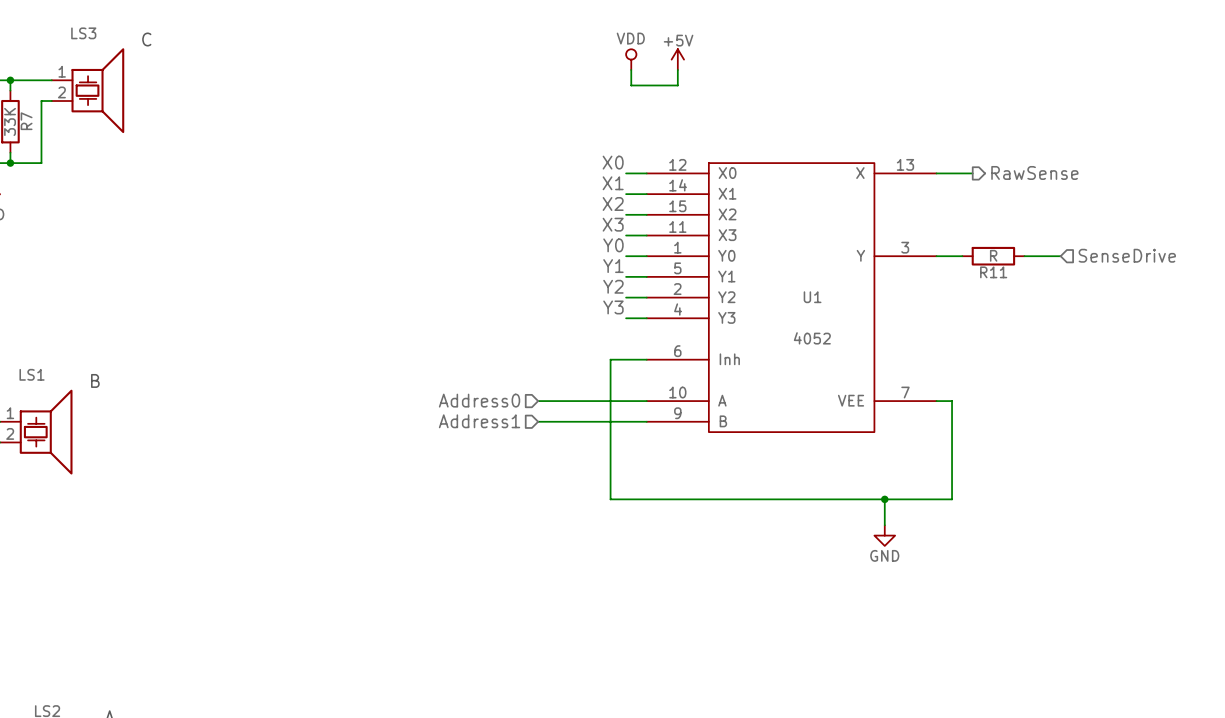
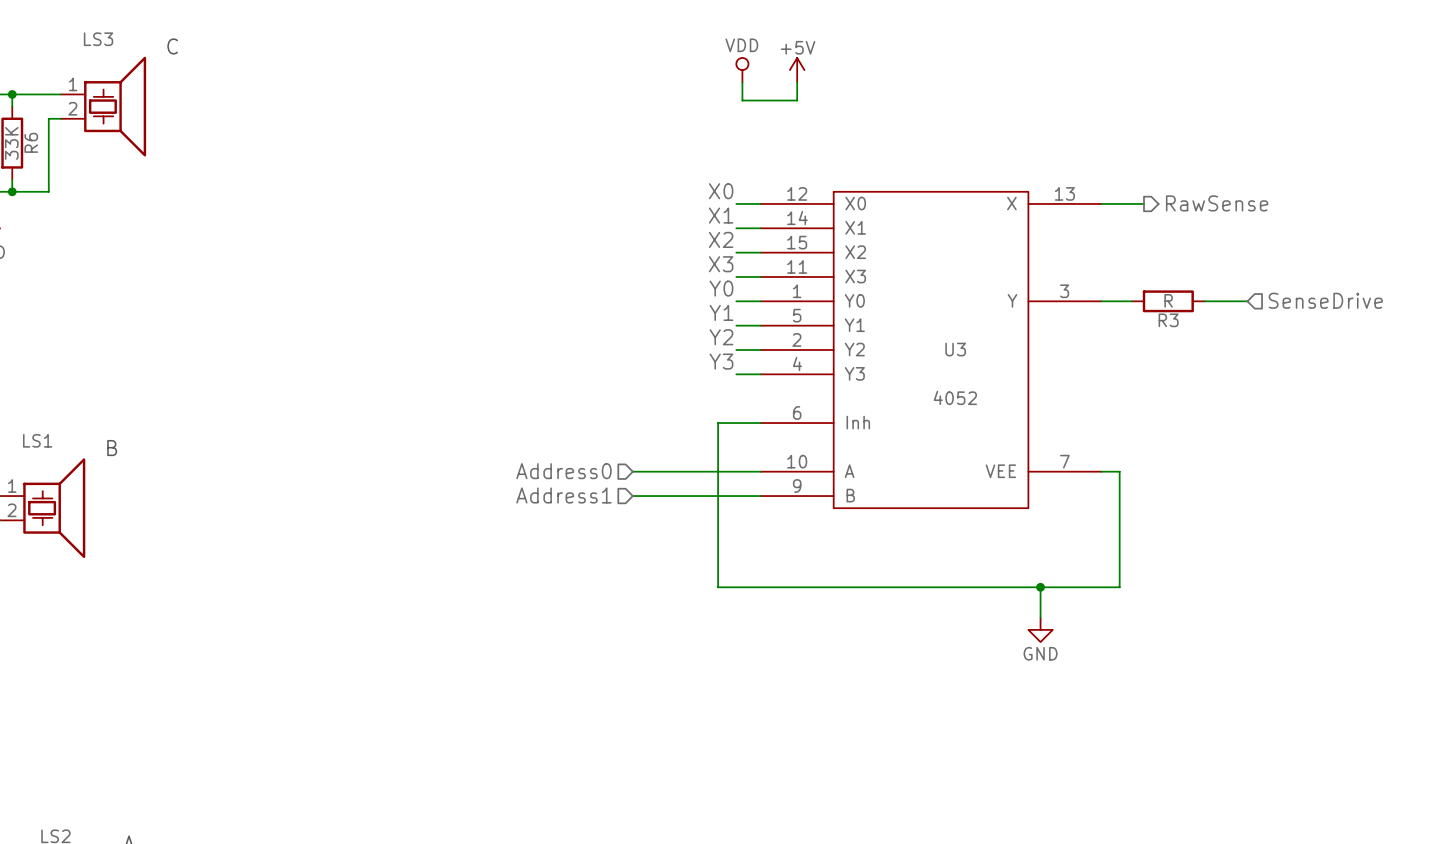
R7 name: R7 (26, 121) -> R6 (31, 142)
R11 name: R11 (993, 272) -> R3 (1168, 320)
U1 name: U1 (812, 297) -> U3 (955, 349)

